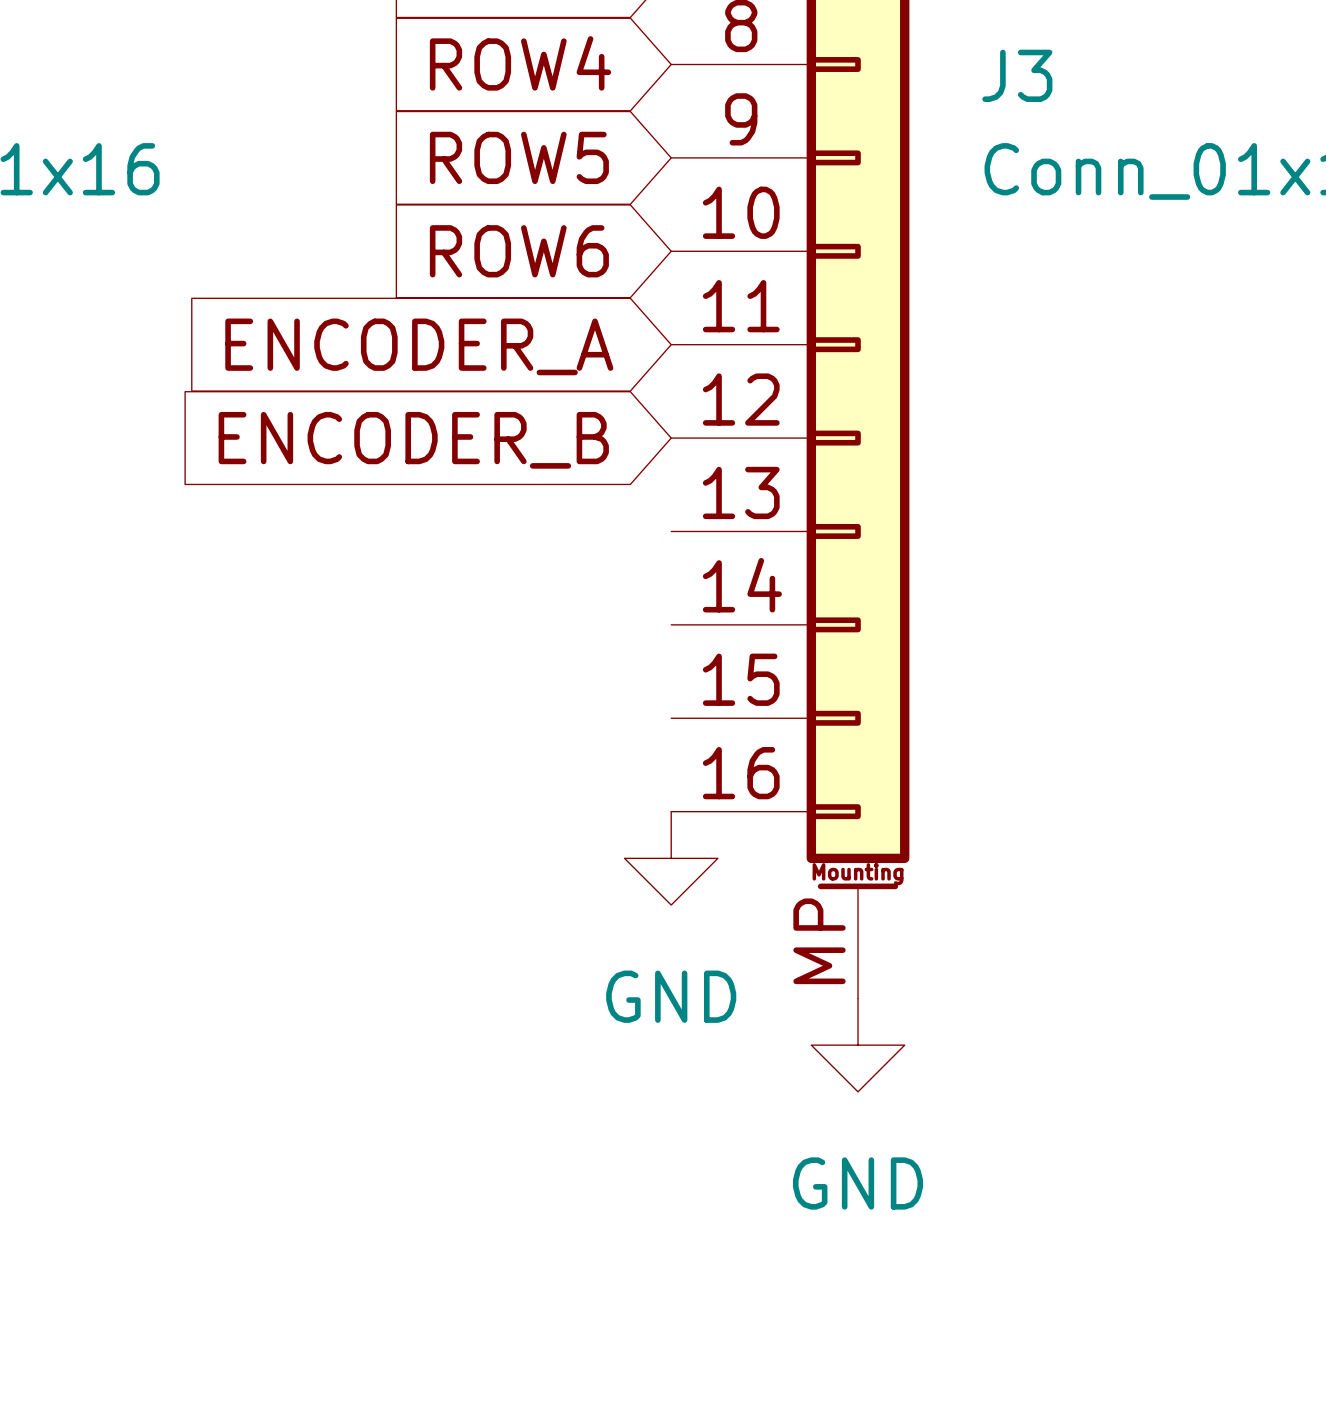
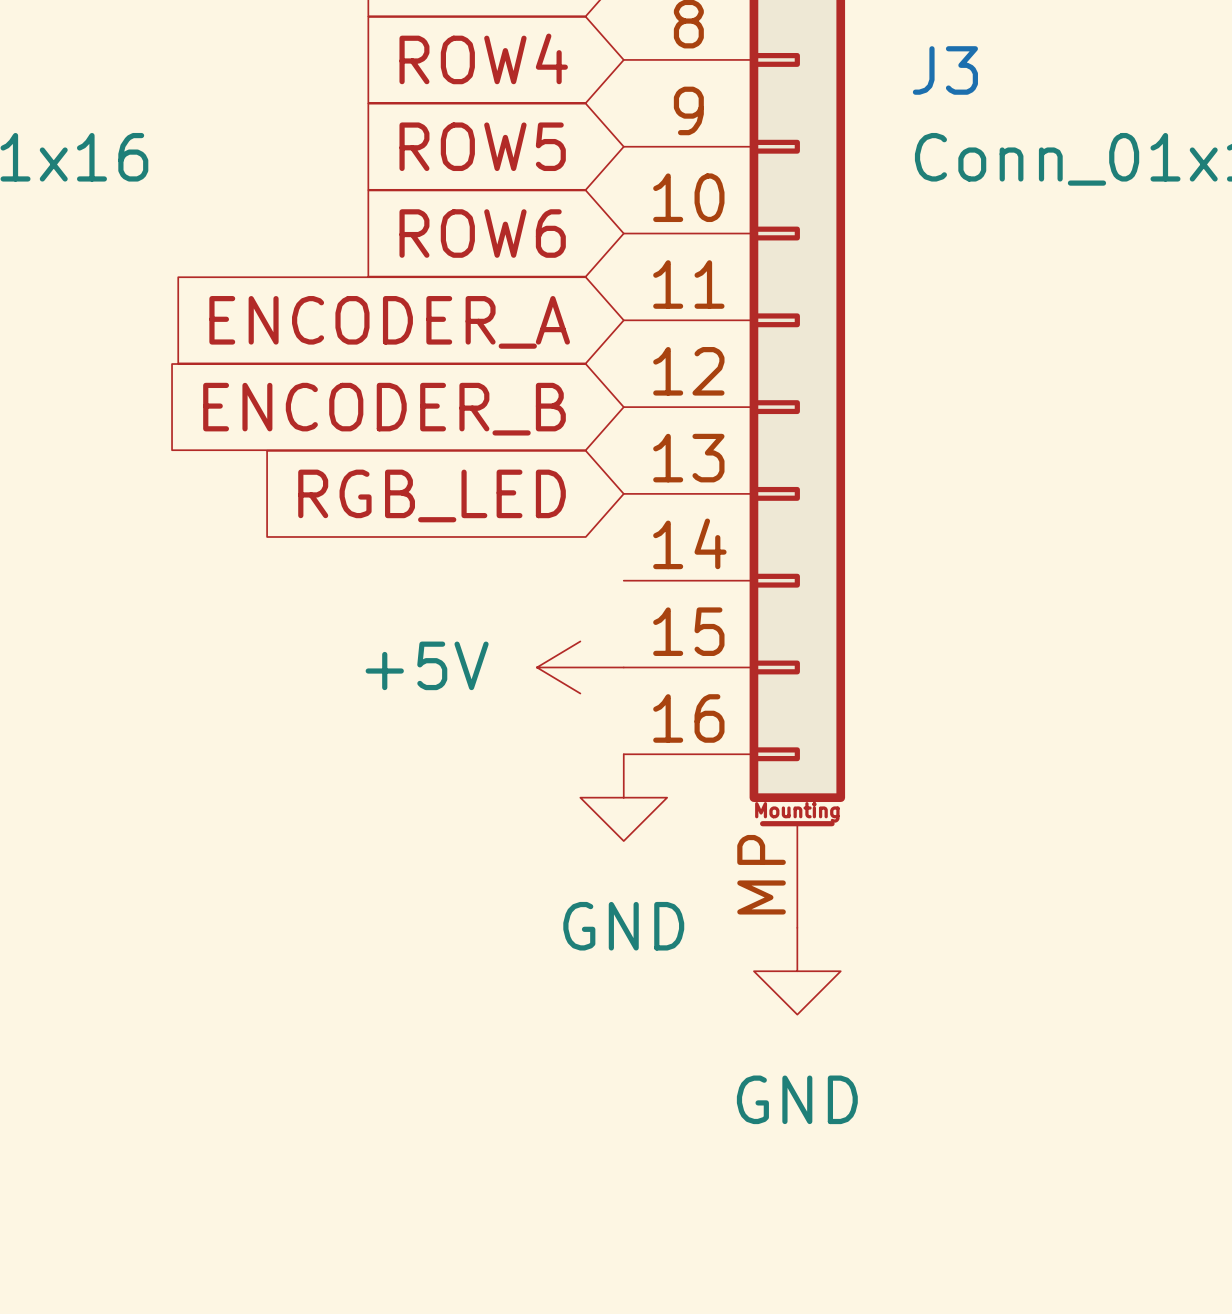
global label: none -> RGB_LED (432, 495)
power symbol: none -> +5V (580, 667)

